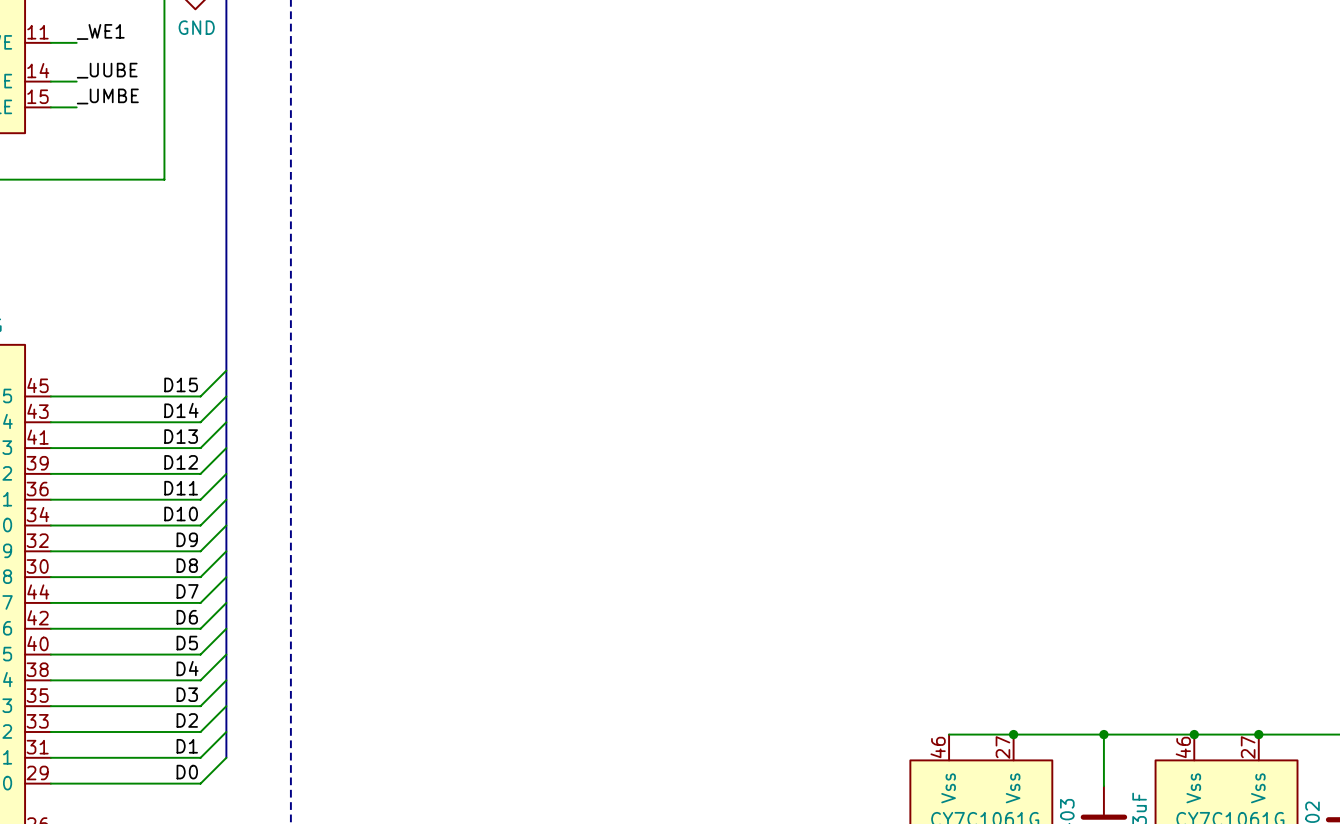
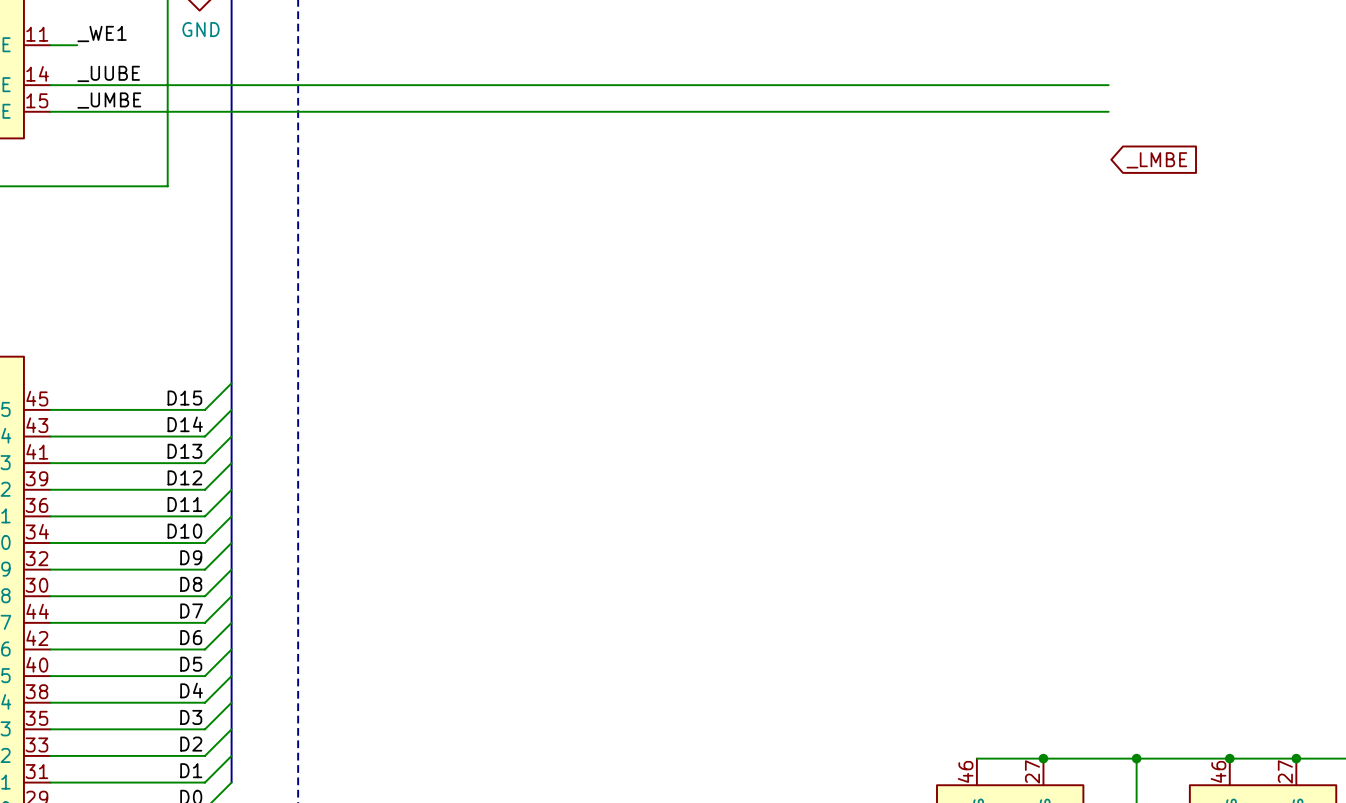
wire: none -> (77, 85) (1108, 85)
wire: none -> (77, 111) (1108, 111)
global label: none -> _LMBE (1156, 160)

